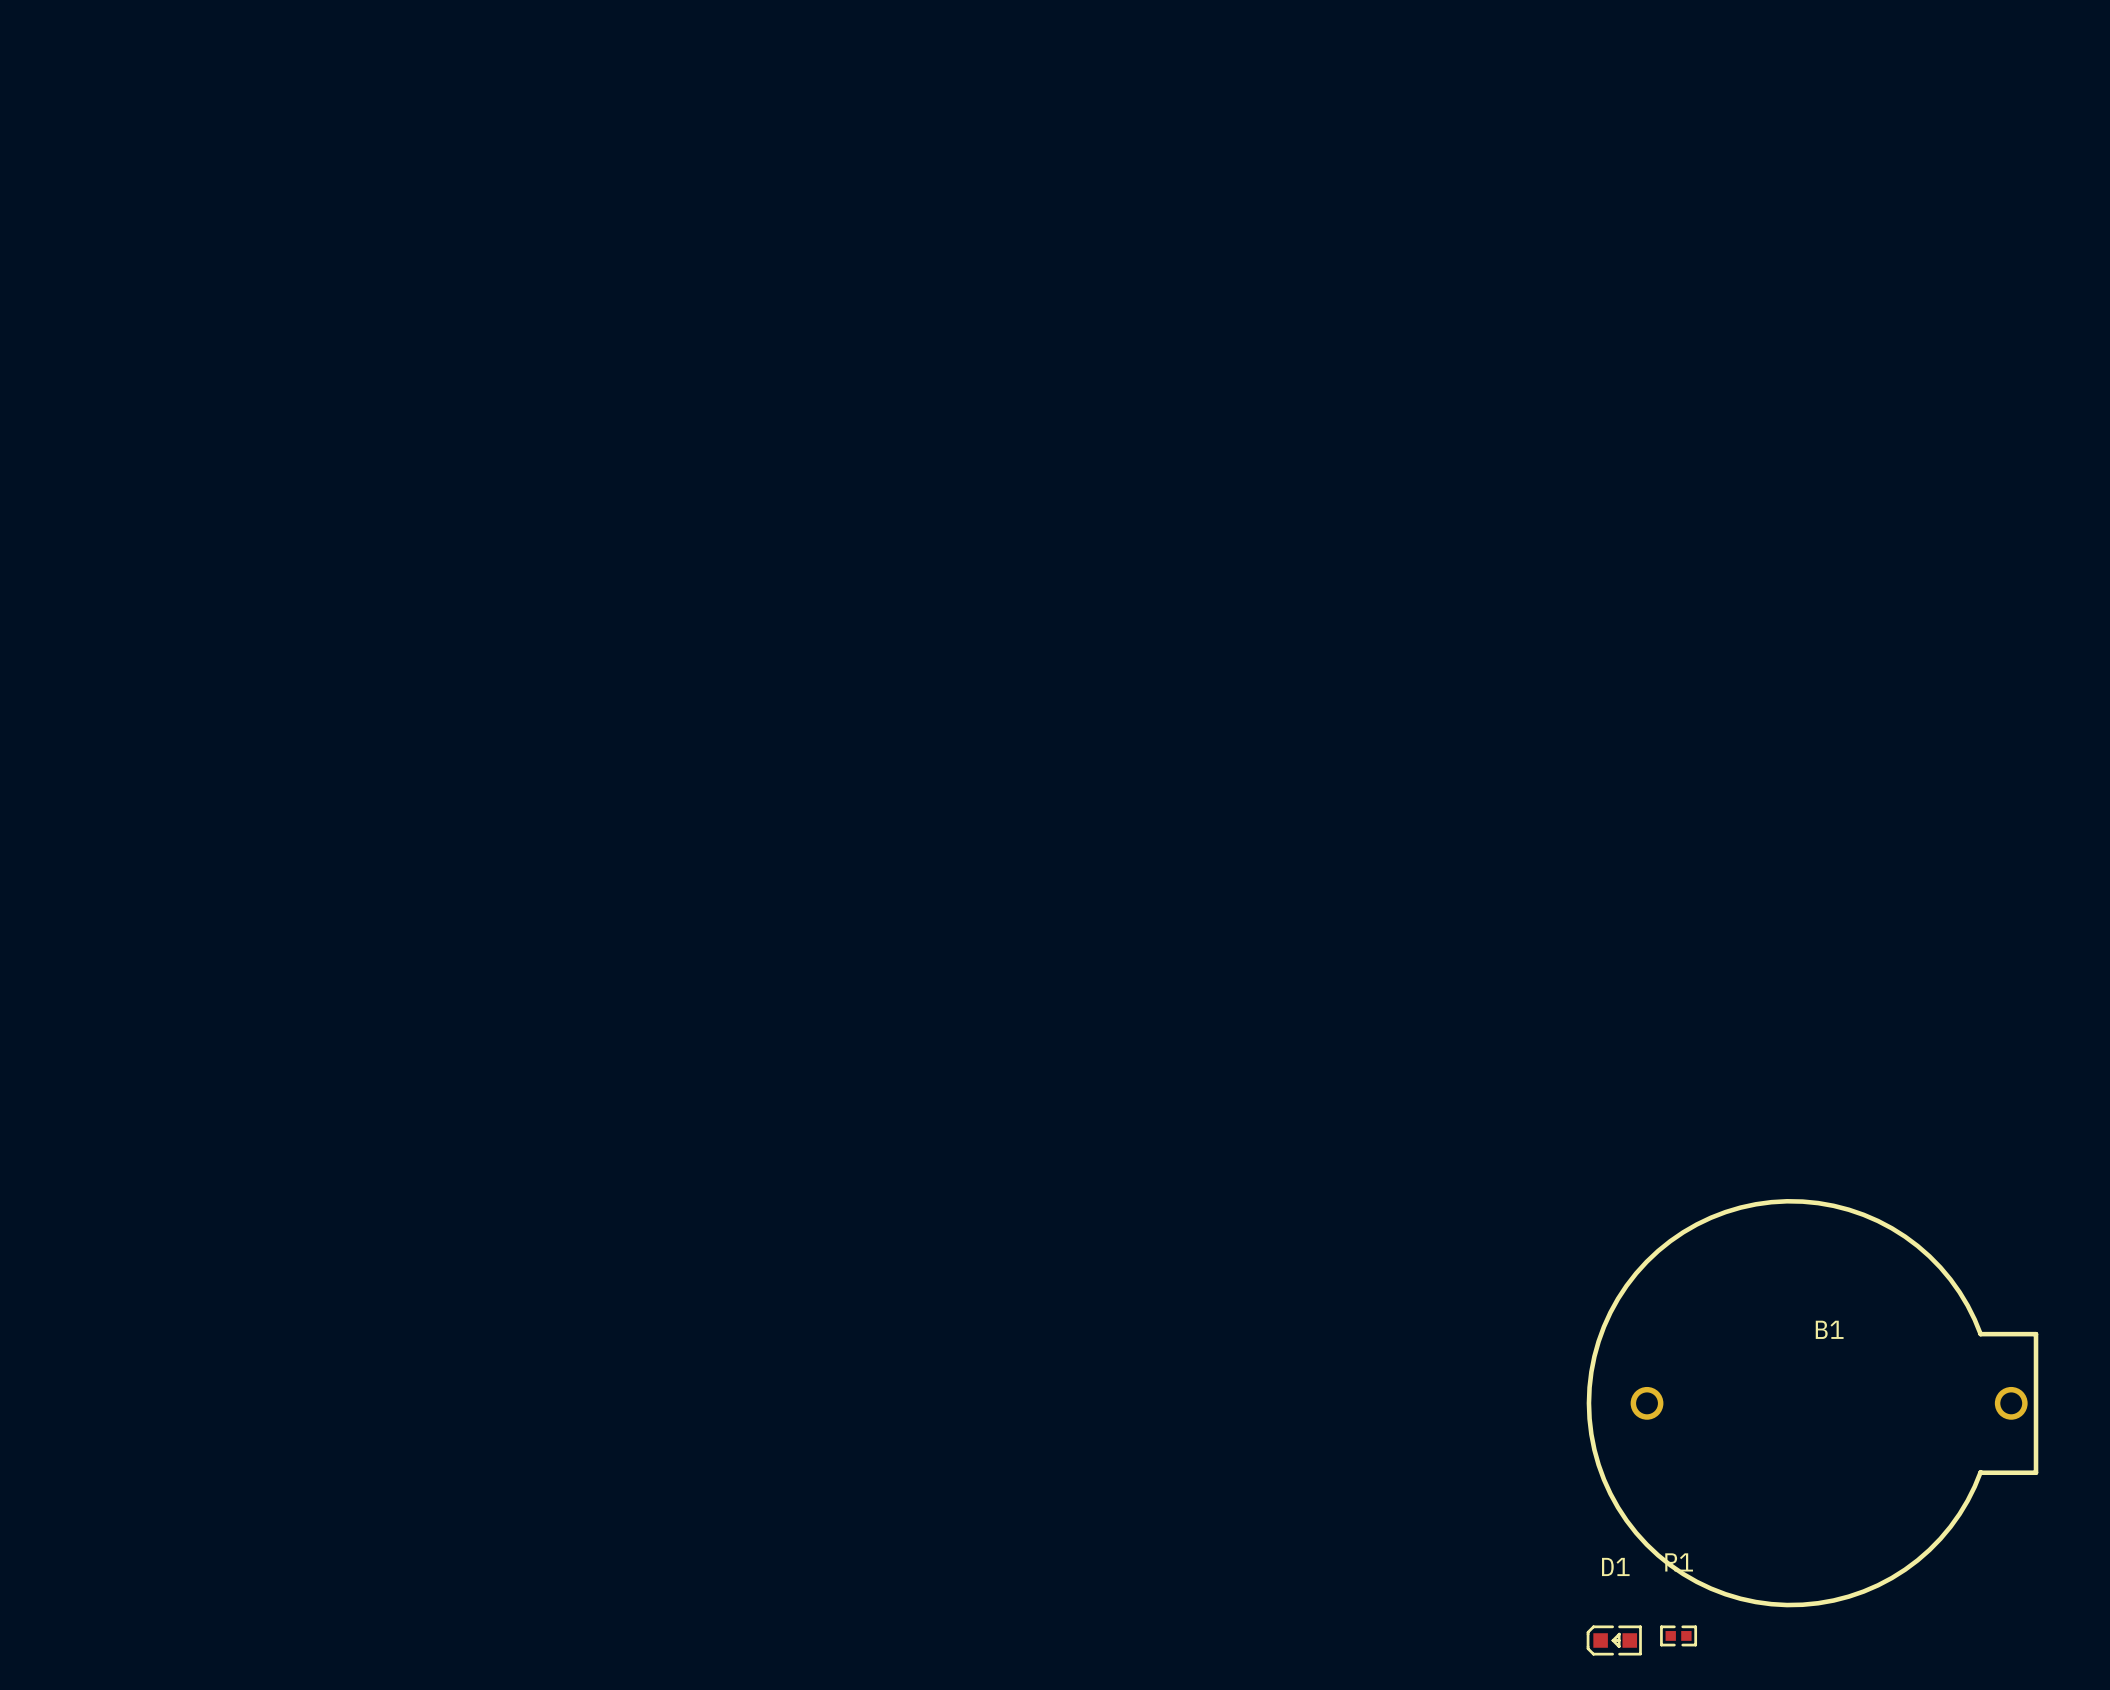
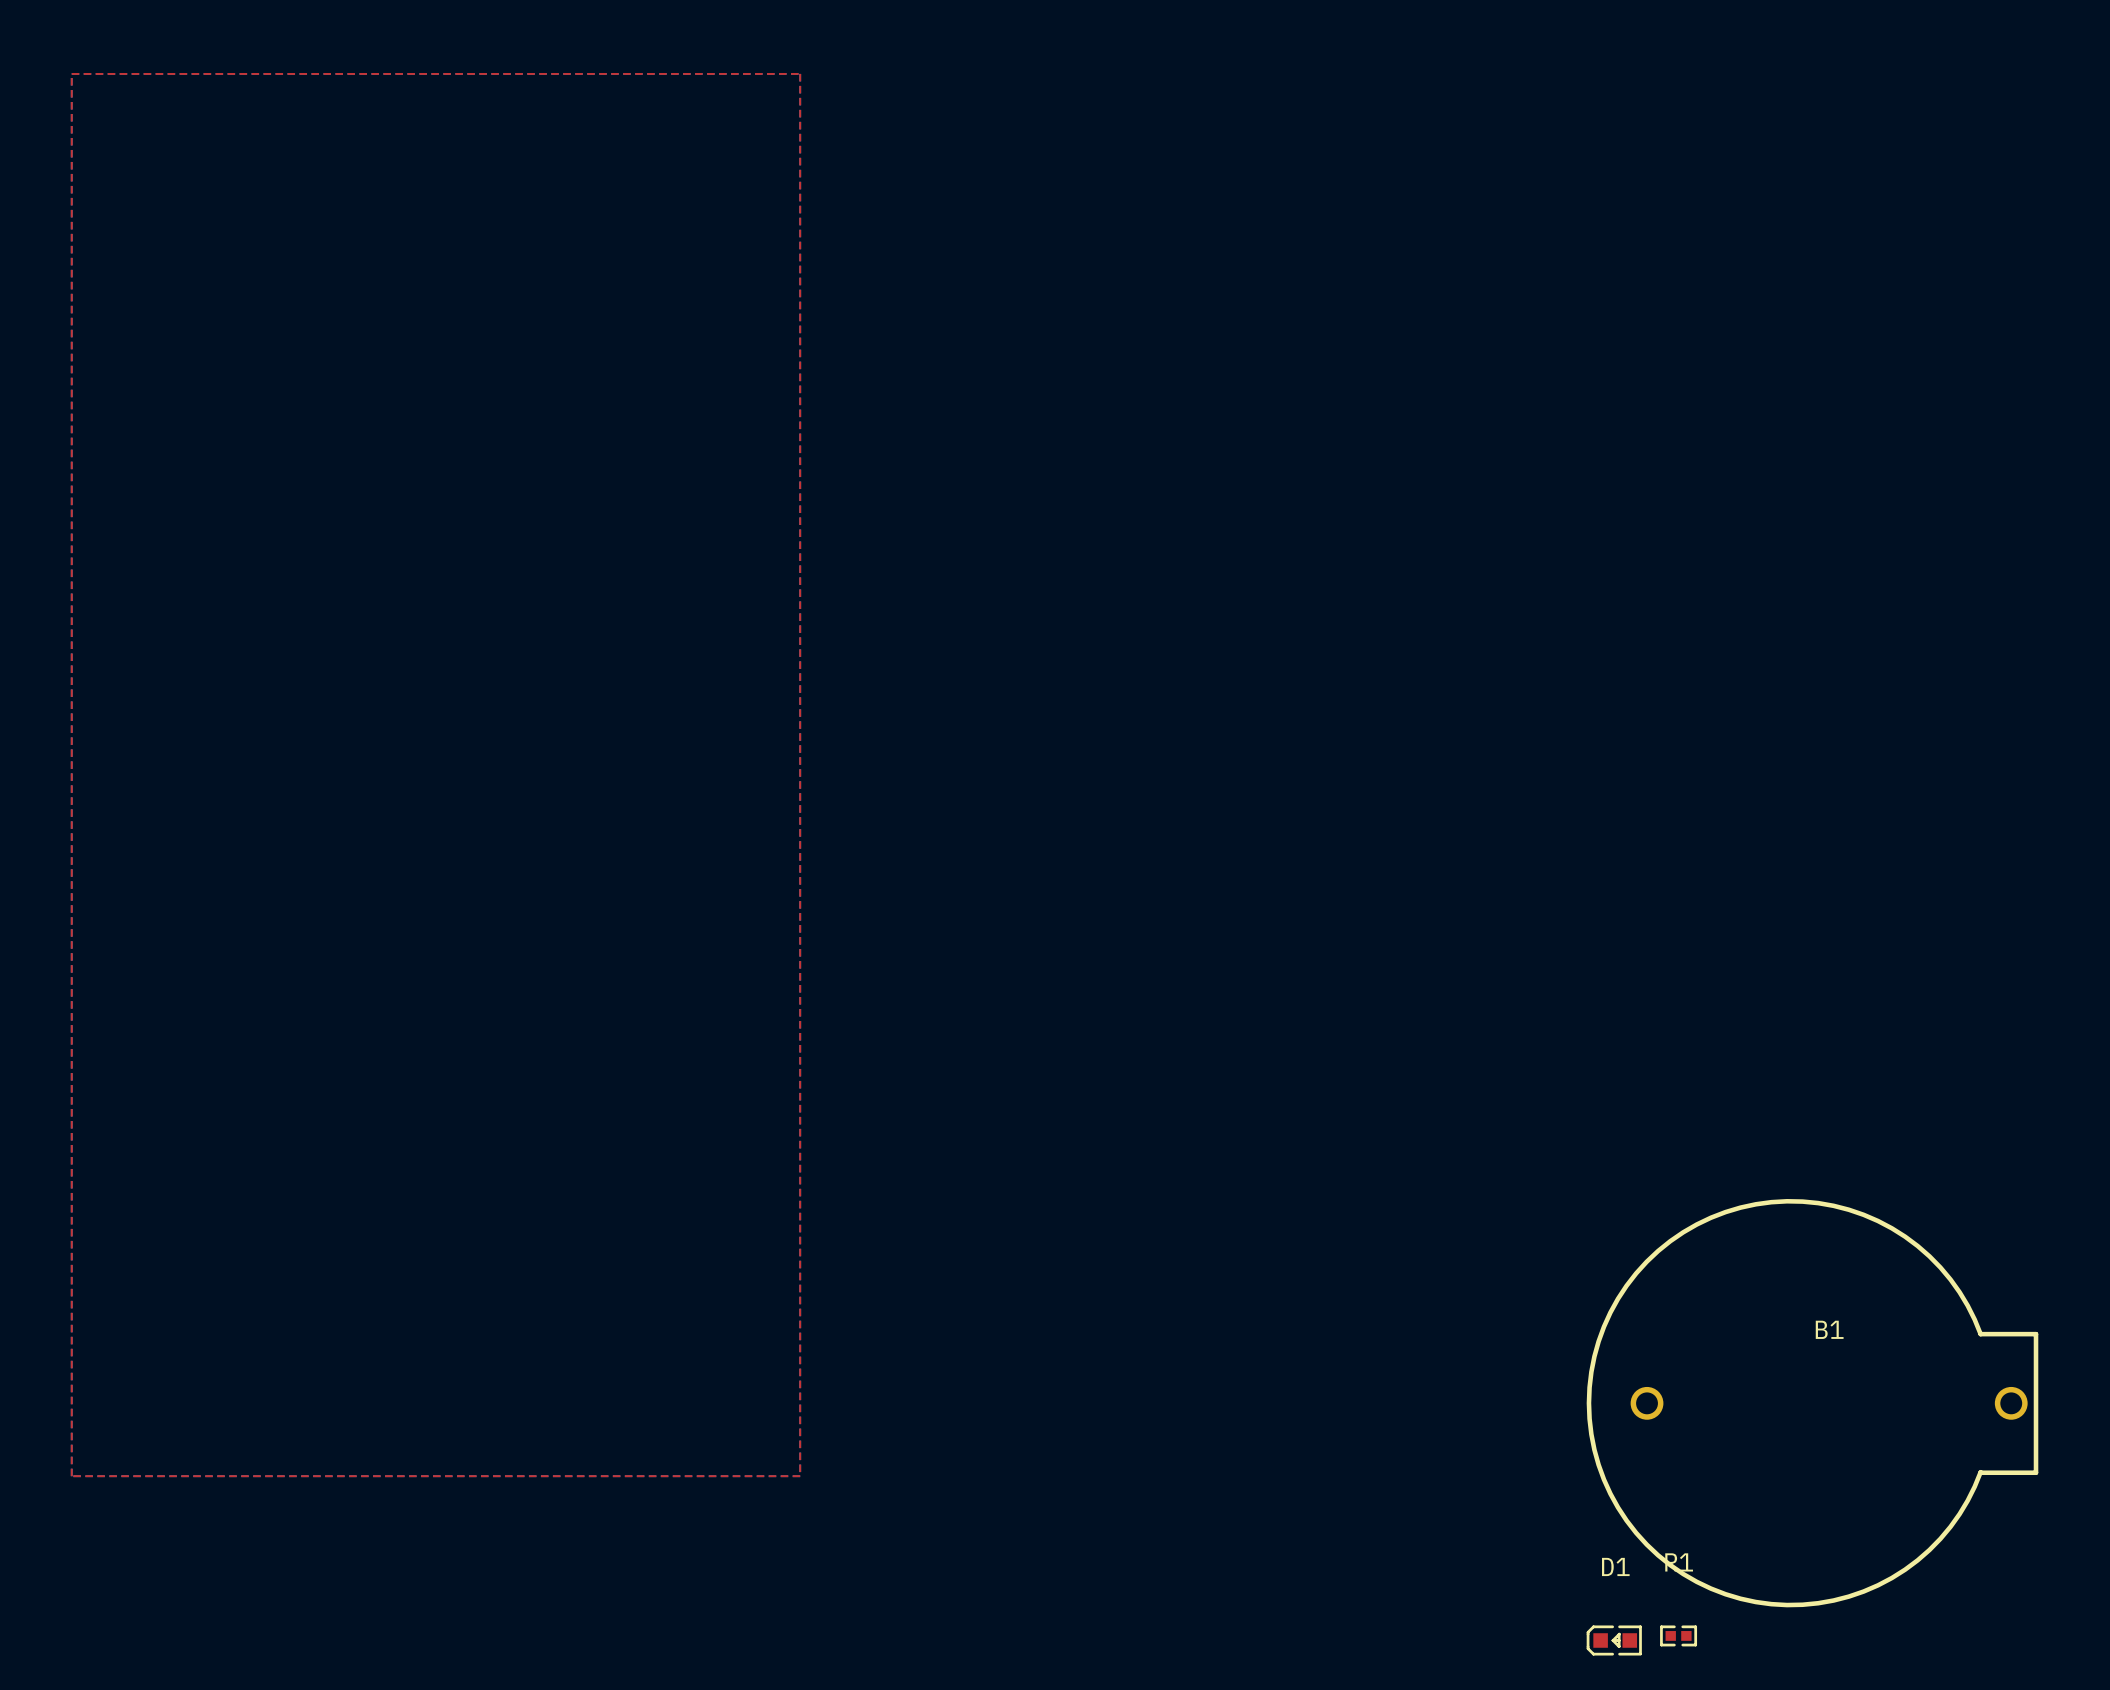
top zone outline: none -> (71, 73) (800, 73) (800, 1476) (71, 1476) (71, 73)

